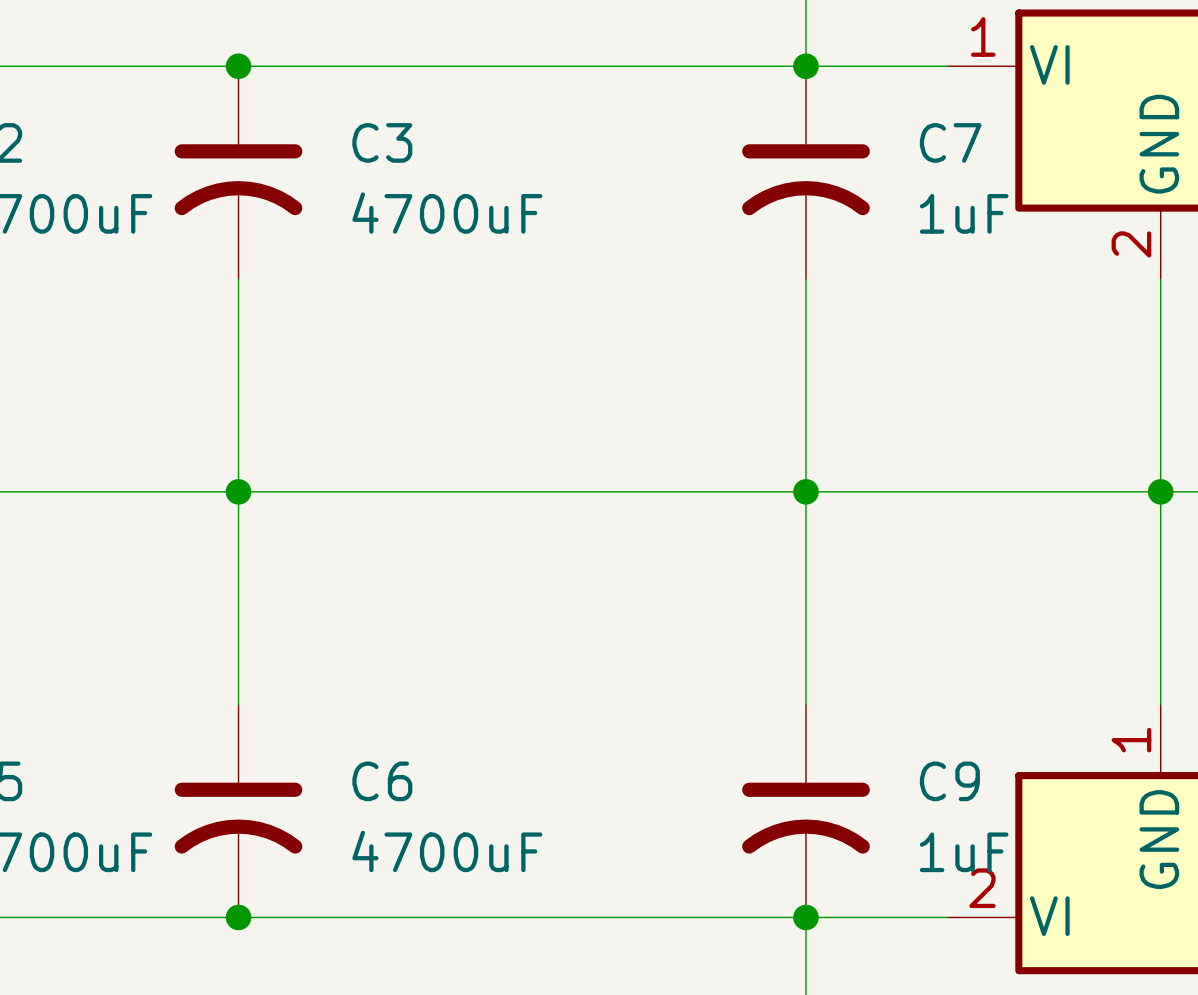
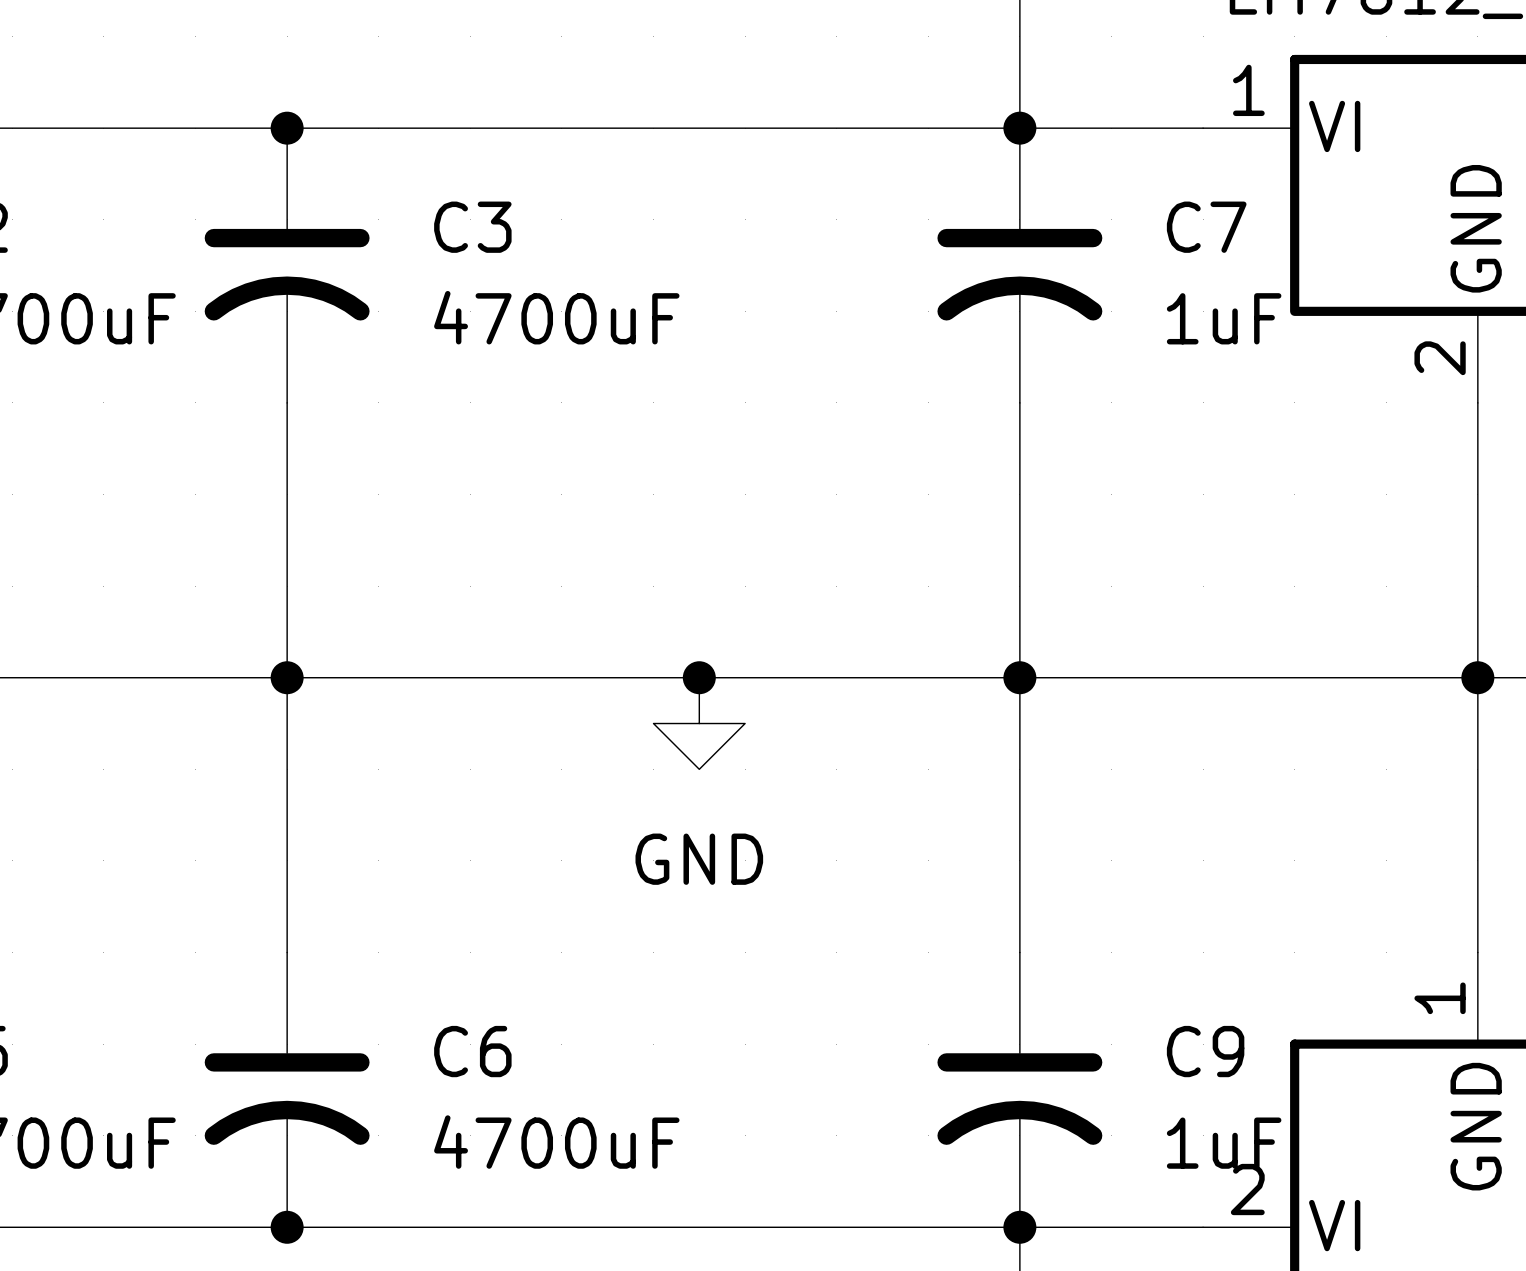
junction: none -> (699, 677)
power symbol: none -> GND (699, 723)

